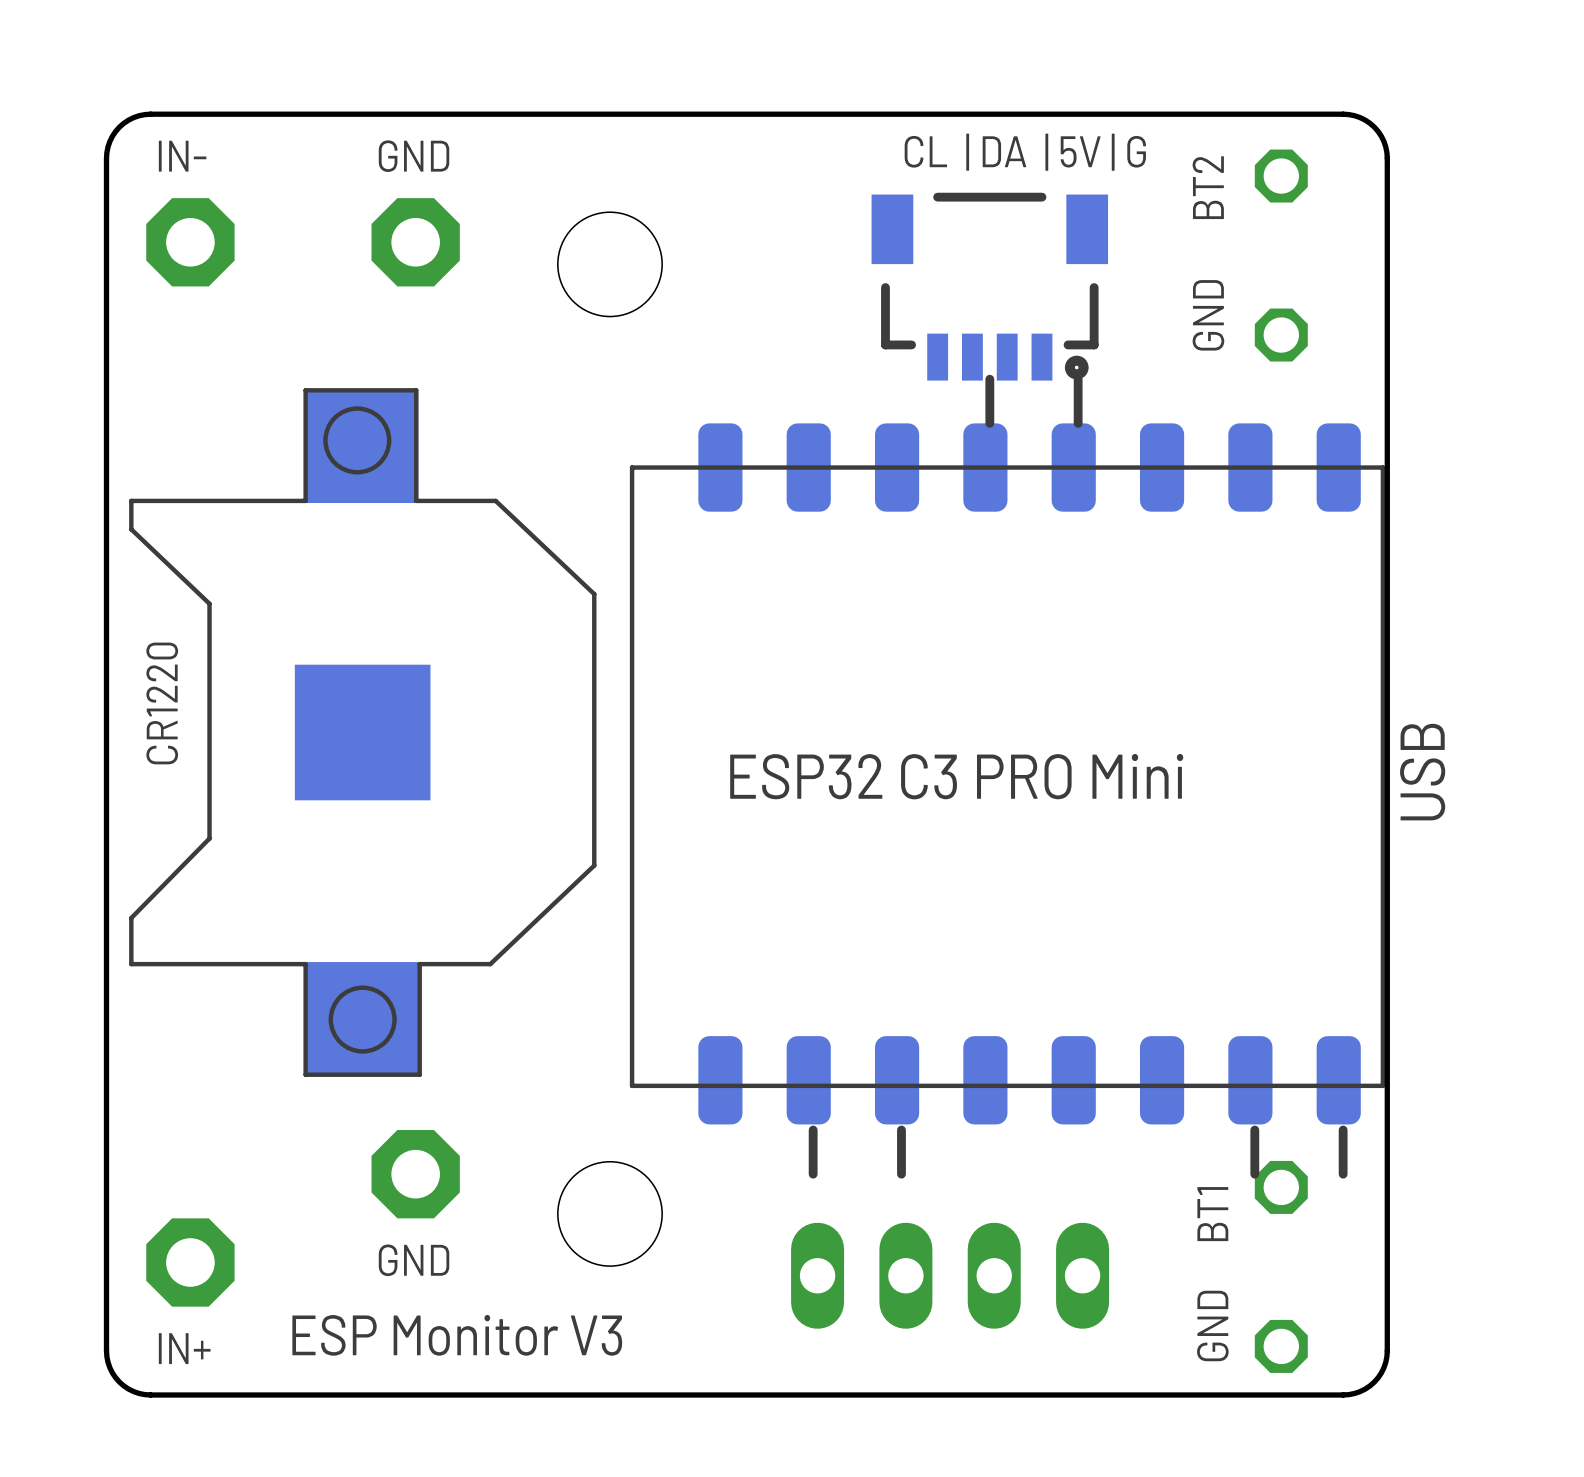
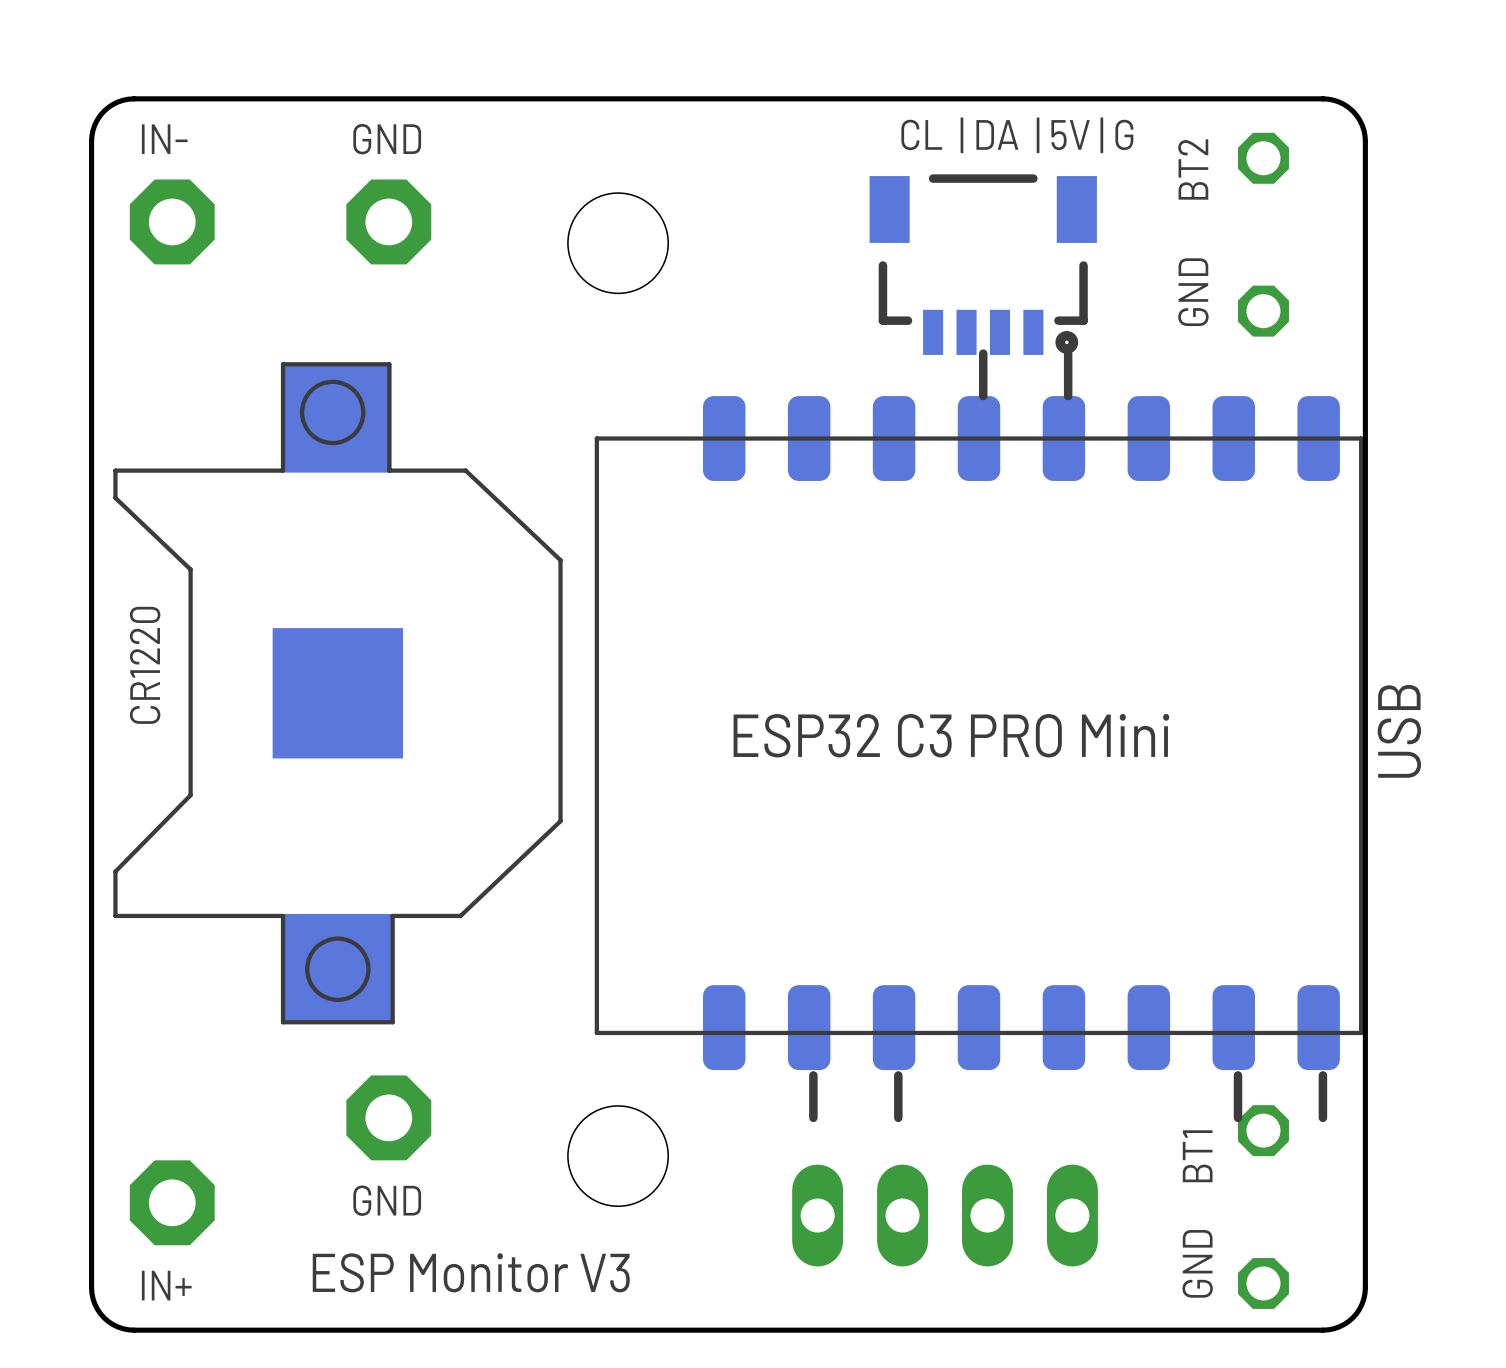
board edge: (150, 114) (133, 117) (119, 127) (109, 141) (106, 158) (106, 1350) (109, 1367) (119, 1382) (133, 1391) (150, 1395) -> (176, 98) (128, 99) (112, 104) (97, 120) (91, 141) (91, 1293) (100, 1313) (117, 1326) (134, 1330) (176, 1330)
text position: IN- (182, 156) -> IN- (164, 139)
text position: GND (414, 156) -> GND (387, 139)
part position: (190, 242) -> (172, 221)
part position: (415, 242) -> (388, 221)
part footprint: [629, 423, 1386, 1125] -> [594, 396, 1364, 1071]
CR1220 position: (362, 732) -> (337, 693)
part position: (415, 1174) -> (388, 1117)
text position: GND (414, 1260) -> GND (387, 1200)
part position: (190, 1262) -> (172, 1202)
text position: IN+ (184, 1348) -> IN+ (166, 1285)

